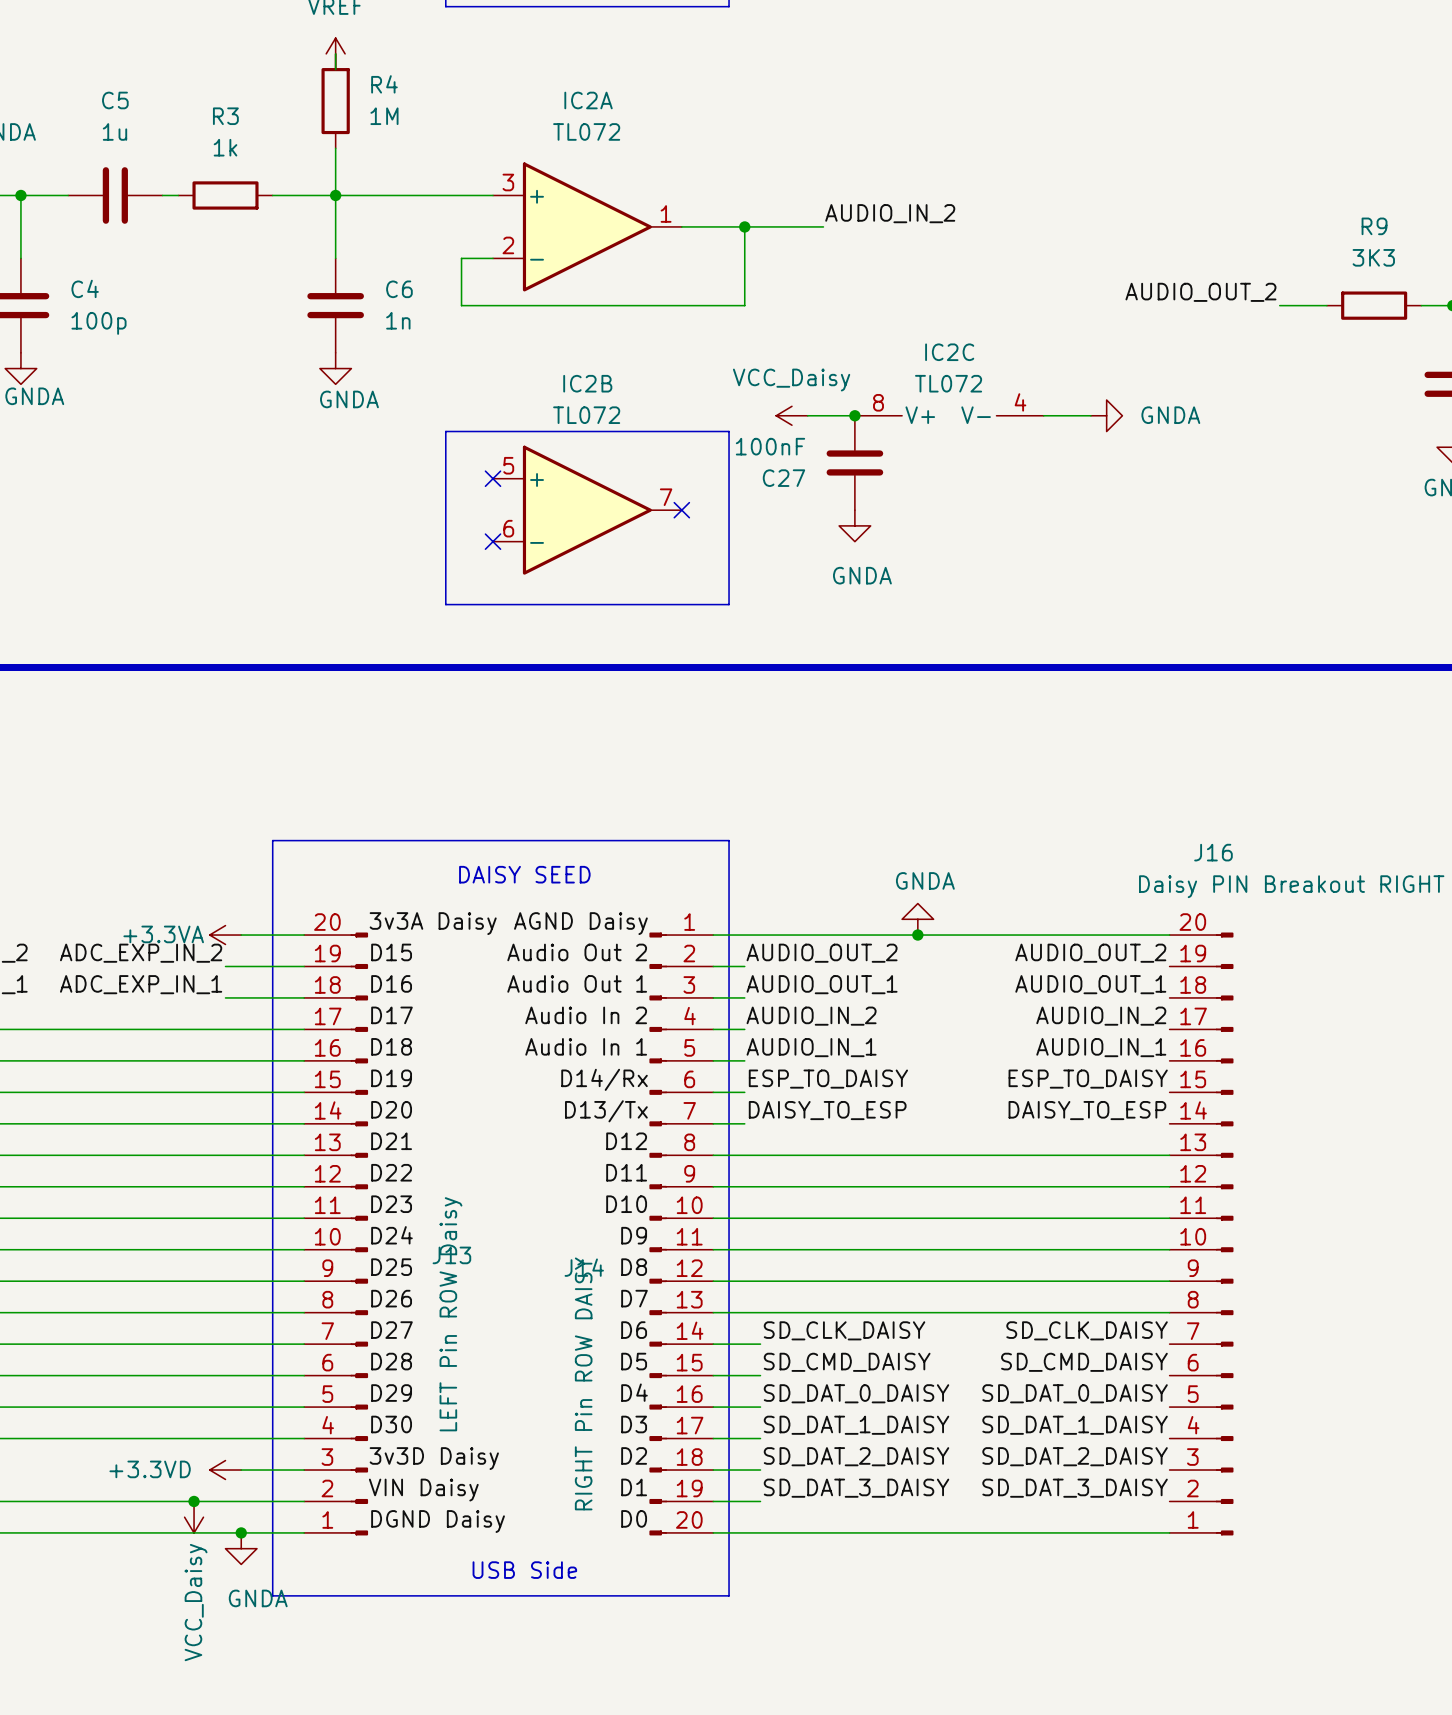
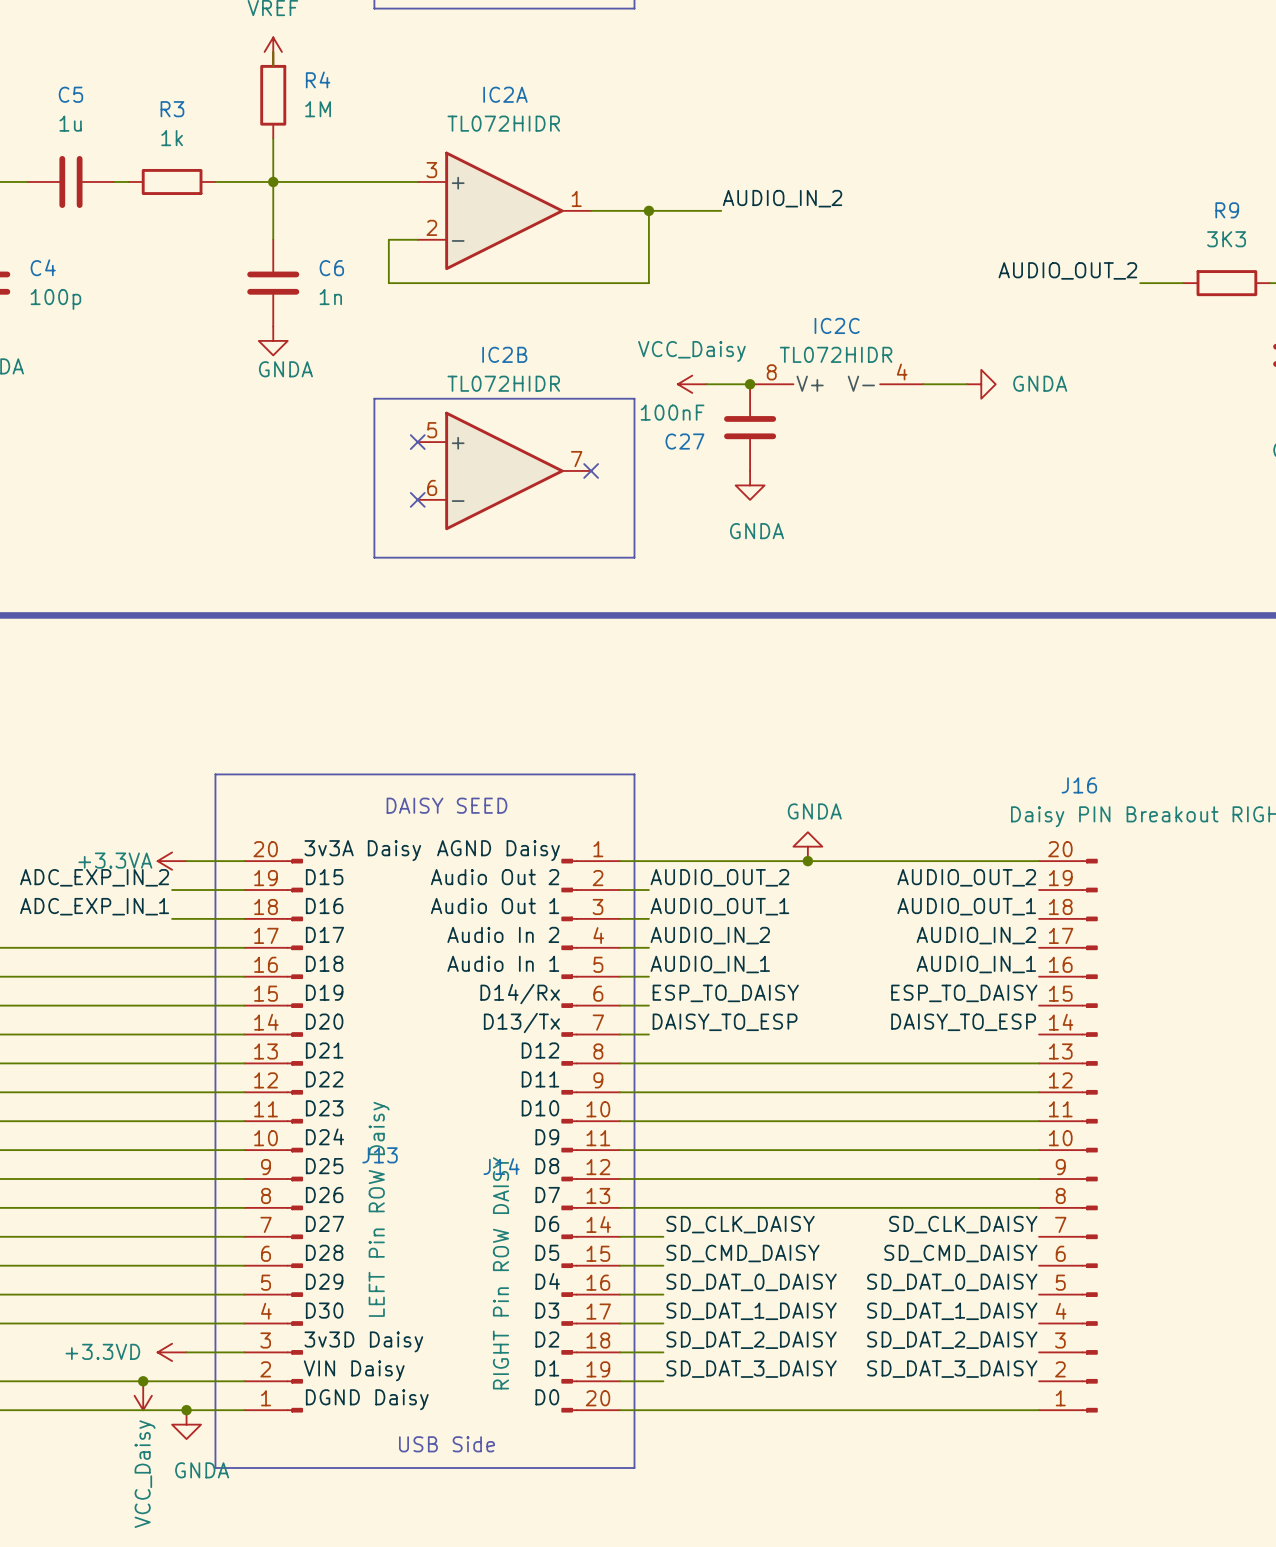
IC2A value: TL072 (586, 131) -> TL072HIDR (503, 123)
IC2C value: TL072 (948, 383) -> TL072HIDR (836, 354)
IC2B value: TL072 (586, 415) -> TL072HIDR (503, 383)

